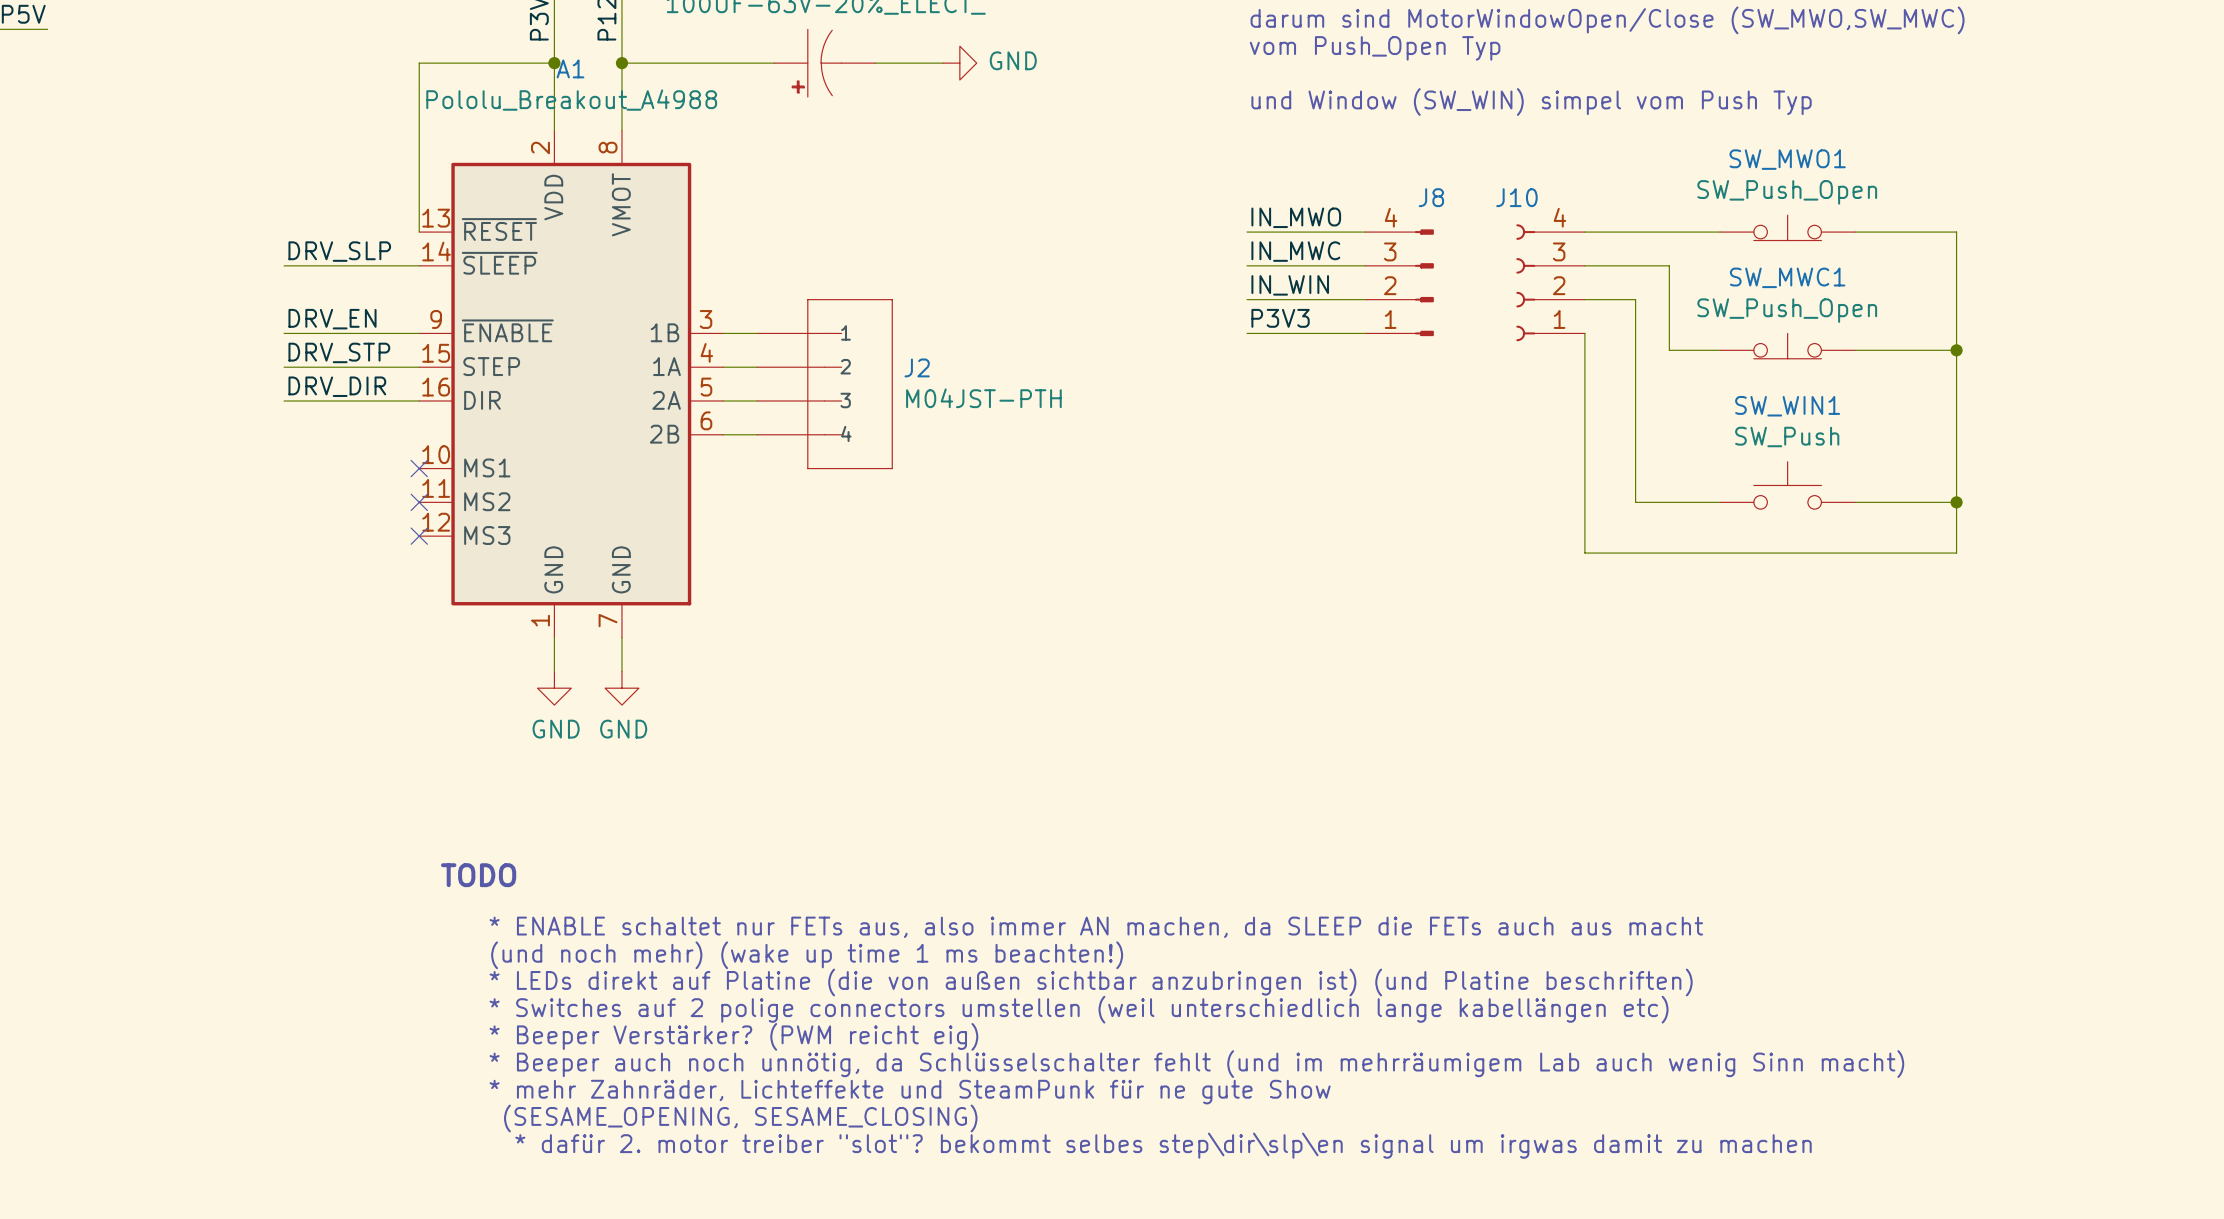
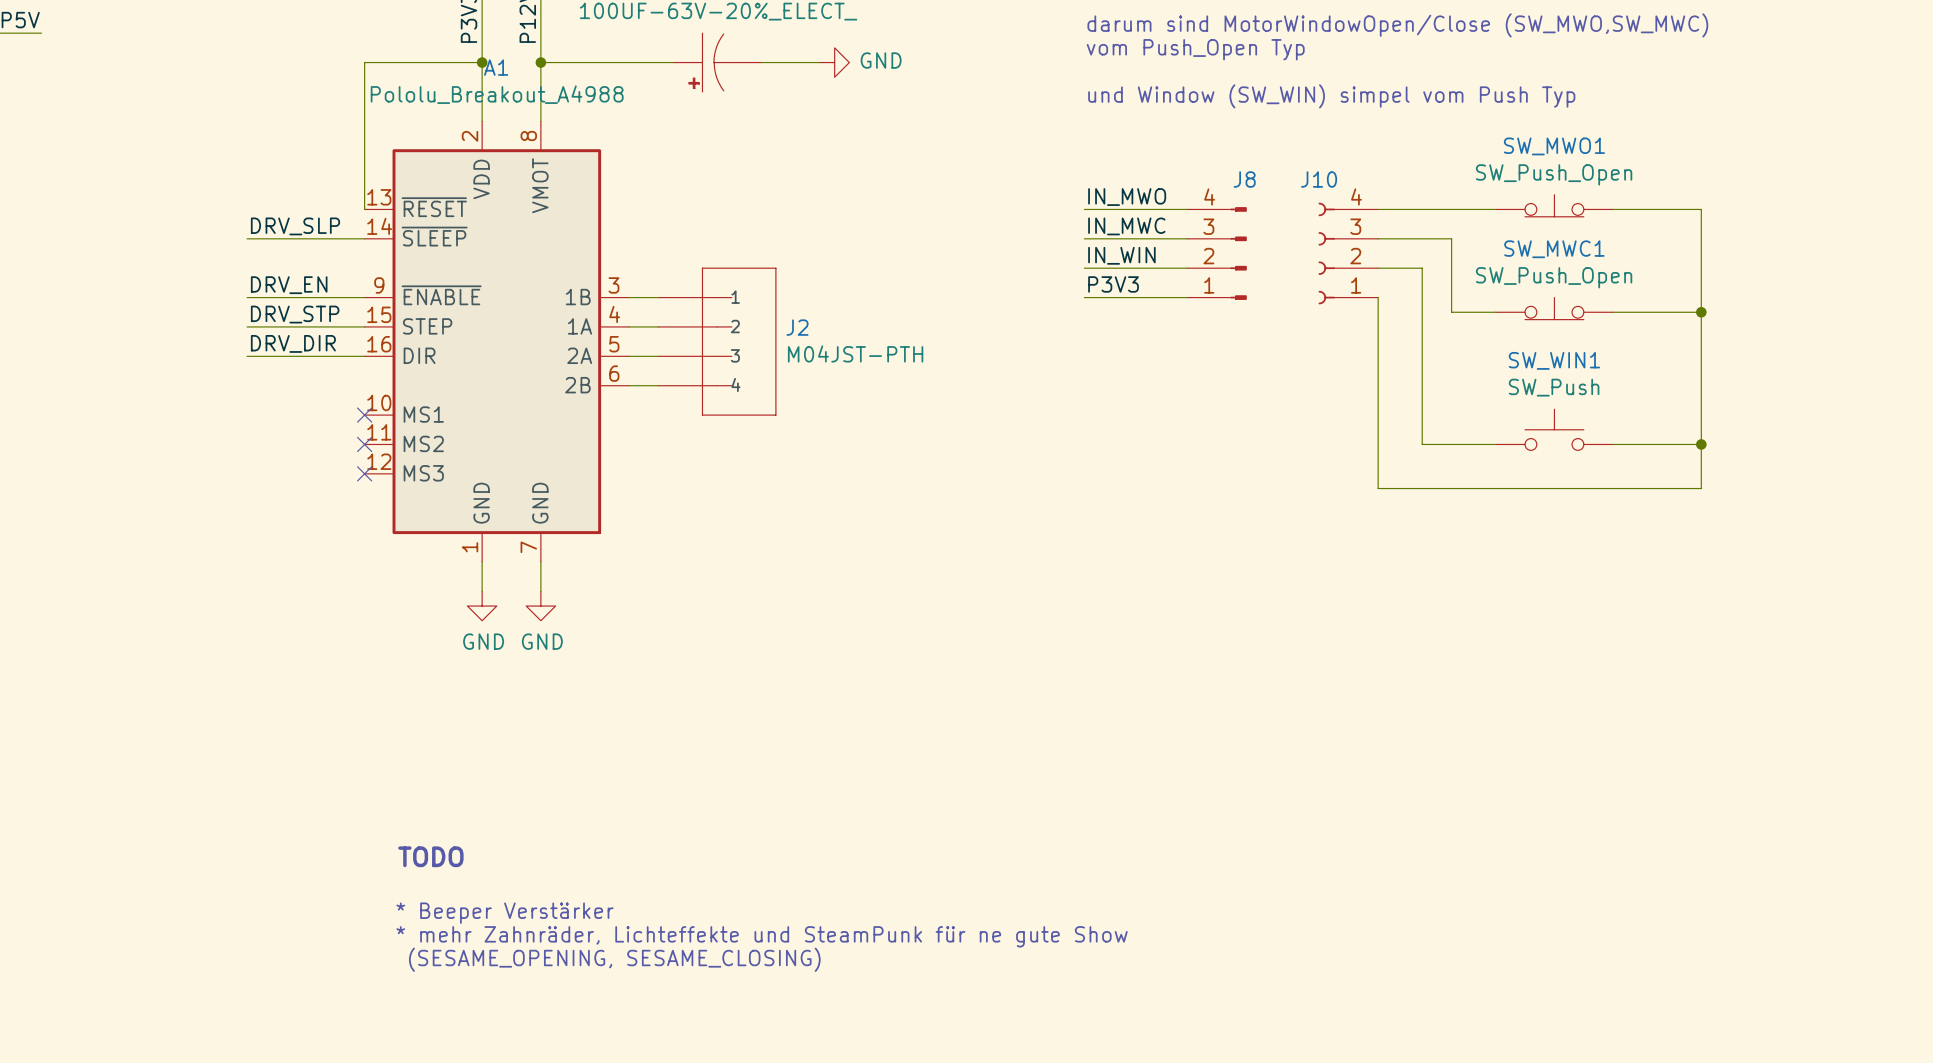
text position: TODO (478, 875) -> TODO (430, 856)
text: * ENABLE schaltet nur FETs aus, also immer AN machen, da SLEEP die FETs auch aus macht (1096, 927) -> none
text: (und noch mehr) (wake up time 1 ms beachten!) (807, 955) -> none
text: * LEDs direkt auf Platine (die von außen sichtbar anzubringen ist) (und Platine beschriften) (1091, 982) -> none
text: * Switches auf 2 polige connectors umstellen (weil unterschiedlich lange kabellängen etc) (1079, 1009) -> none
text: * Beeper Verstärker? (PWM reicht eig) (733, 1036) -> * Beeper Verstärker (504, 913)
text: * Beeper auch noch unnötig, da Schlüsselschalter fehlt (und im mehrräumigem Lab auch wenig Sinn macht) (1196, 1064) -> none
text position: * mehr Zahnräder, Lichteffekte und SteamPunk für ne gute Show (910, 1092) -> * mehr Zahnräder, Lichteffekte und SteamPunk für ne gute Show (762, 936)
text position: (SESAME_OPENING, SESAME_CLOSING) (740, 1118) -> (SESAME_OPENING, SESAME_CLOSING) (614, 959)
text: * dafür 2. motor treiber "slot"? bekommt selbes step\dir\slp\en signal um irgwas damit zu machen (1163, 1145) -> none

